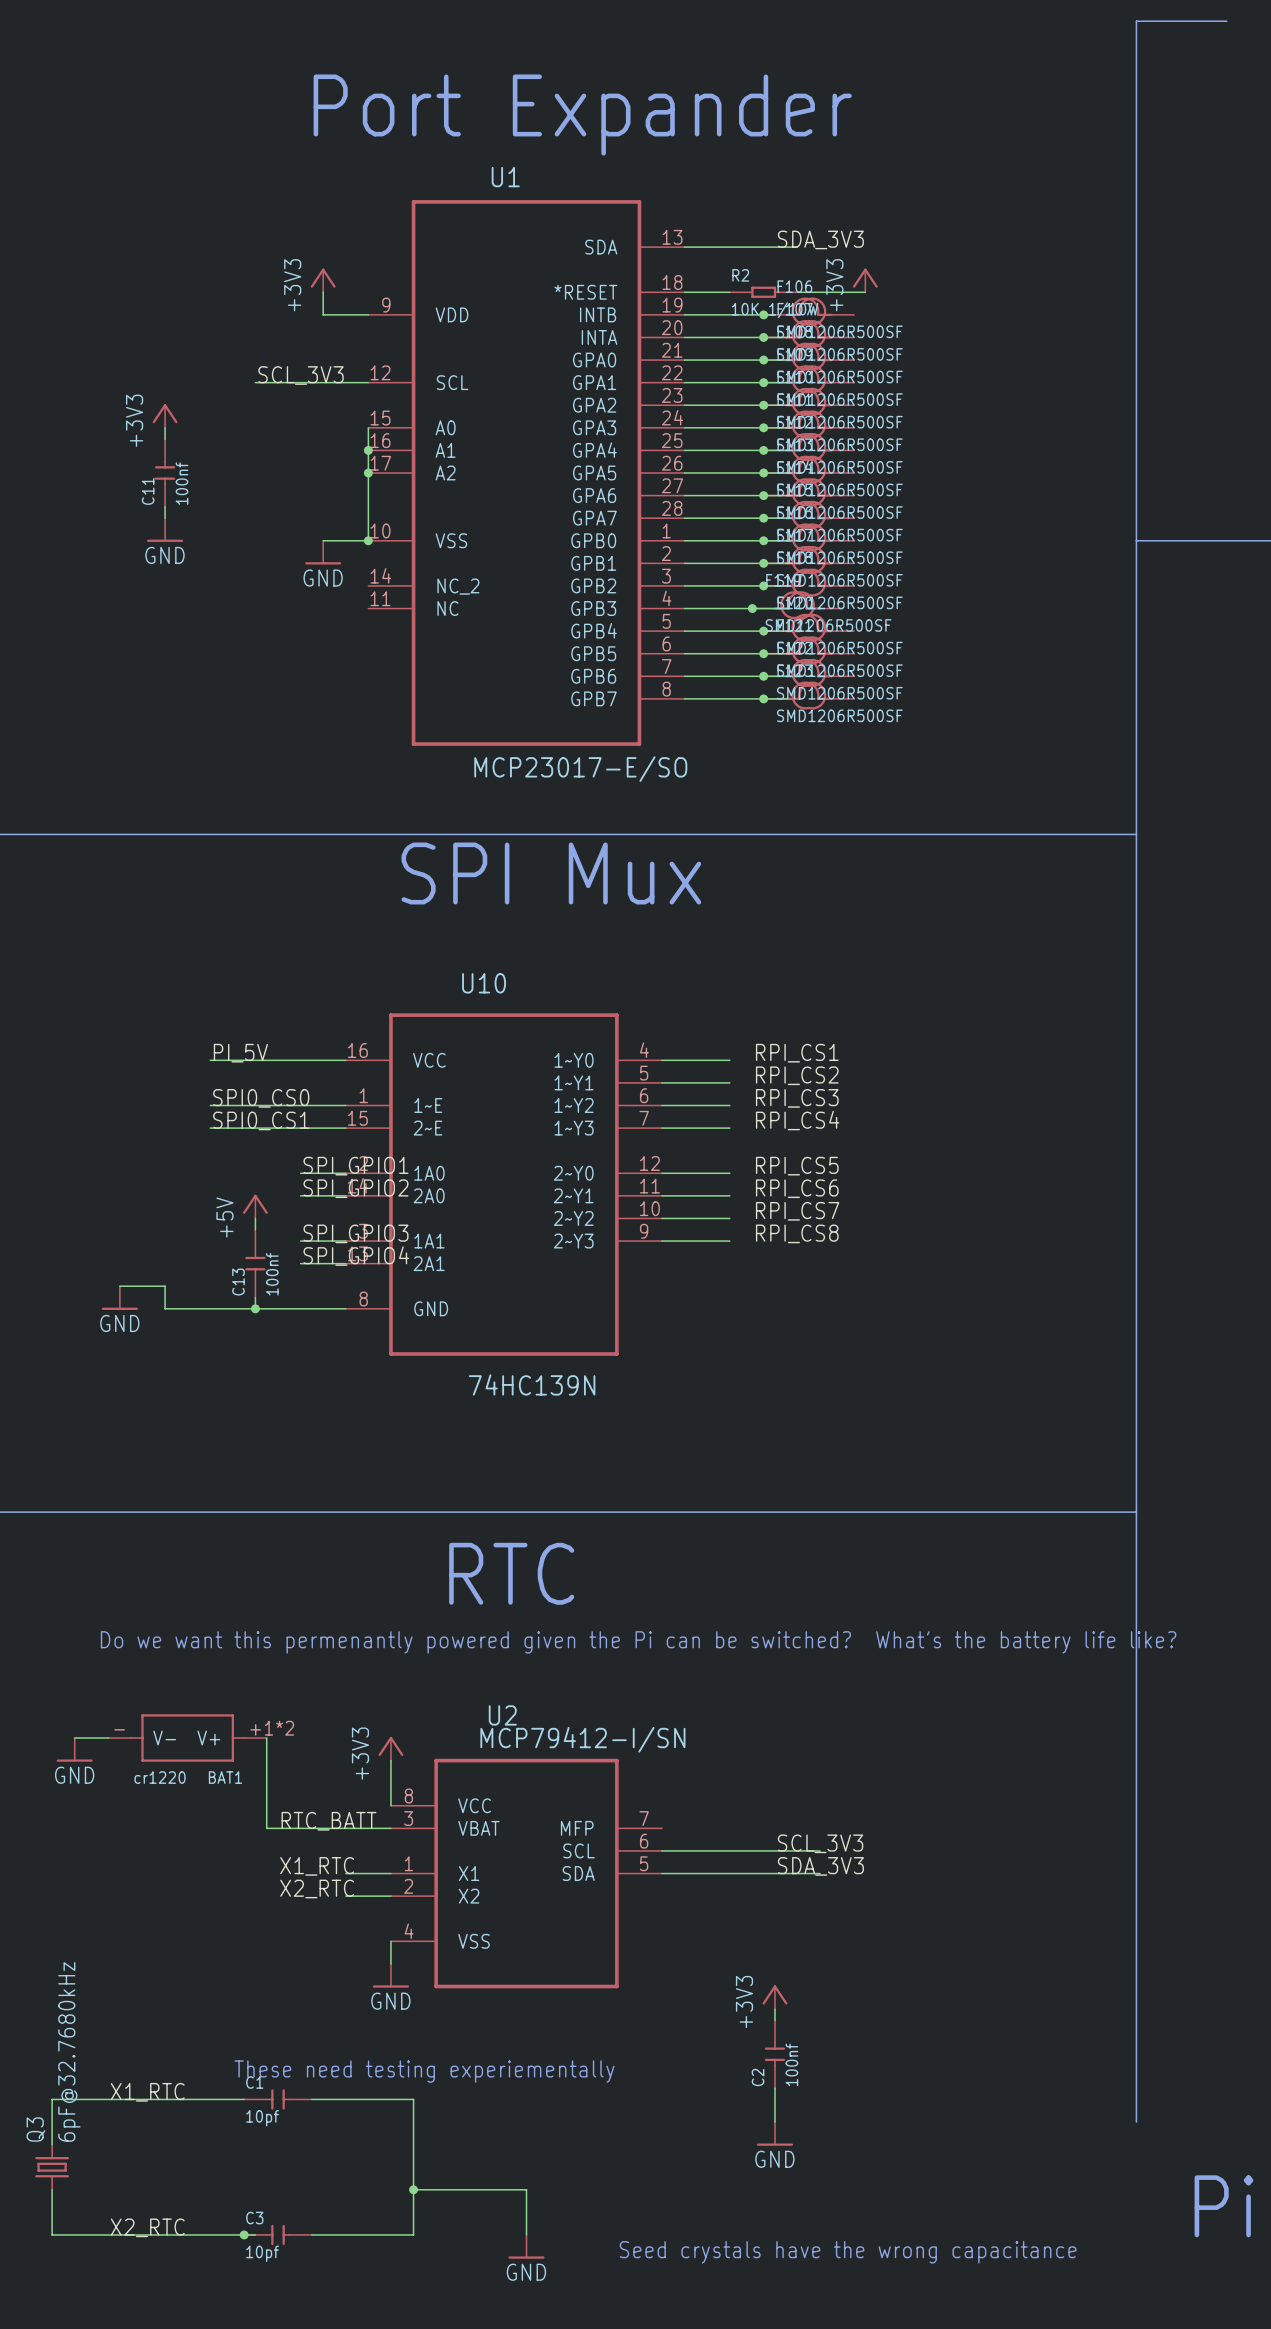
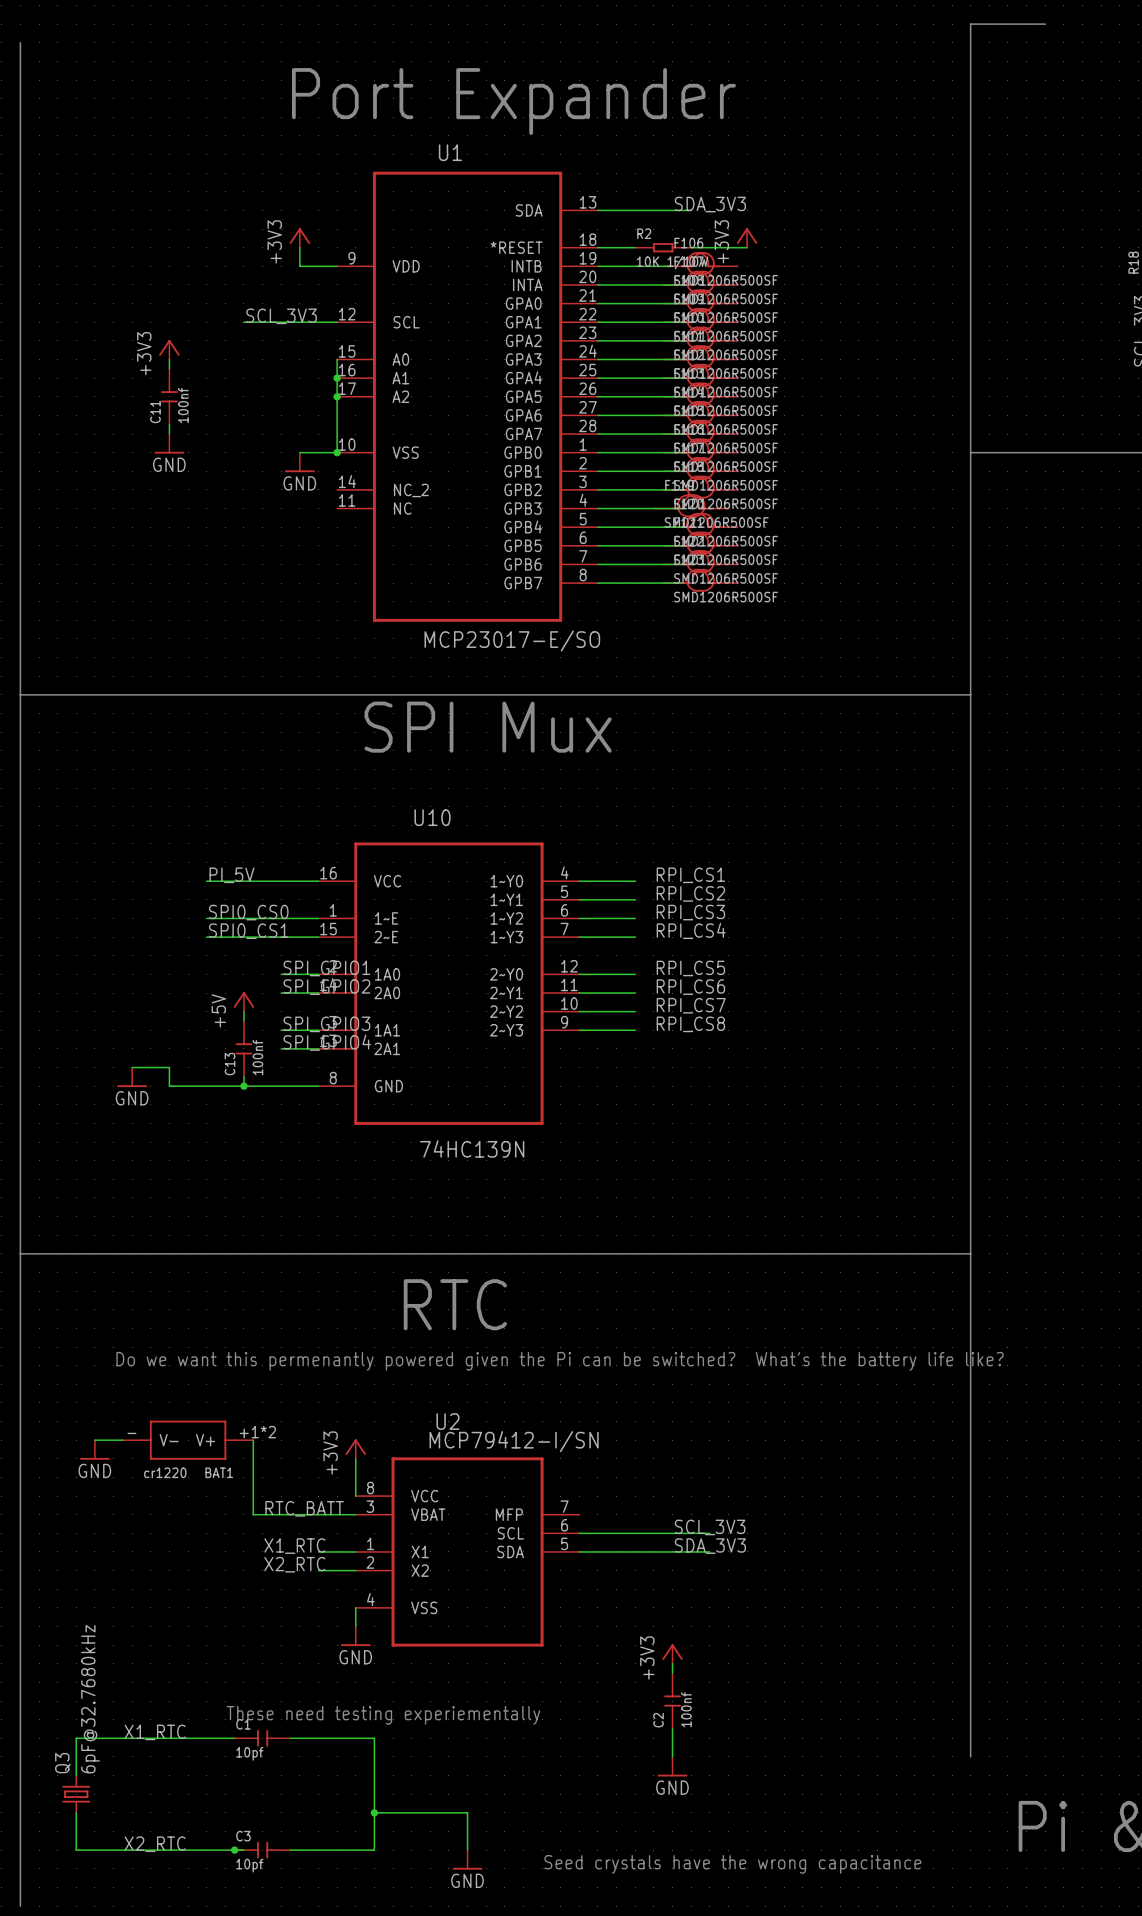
junction: (763, 314) -> none
junction: (763, 337) -> none
junction: (763, 360) -> none
junction: (763, 382) -> none
junction: (763, 405) -> none
junction: (763, 427) -> none
junction: (763, 450) -> none
junction: (763, 473) -> none
junction: (763, 495) -> none
junction: (763, 518) -> none
junction: (763, 540) -> none
junction: (763, 563) -> none
junction: (763, 585) -> none
junction: (752, 608) -> none
junction: (763, 631) -> none
junction: (763, 653) -> none
junction: (763, 676) -> none
junction: (763, 698) -> none

